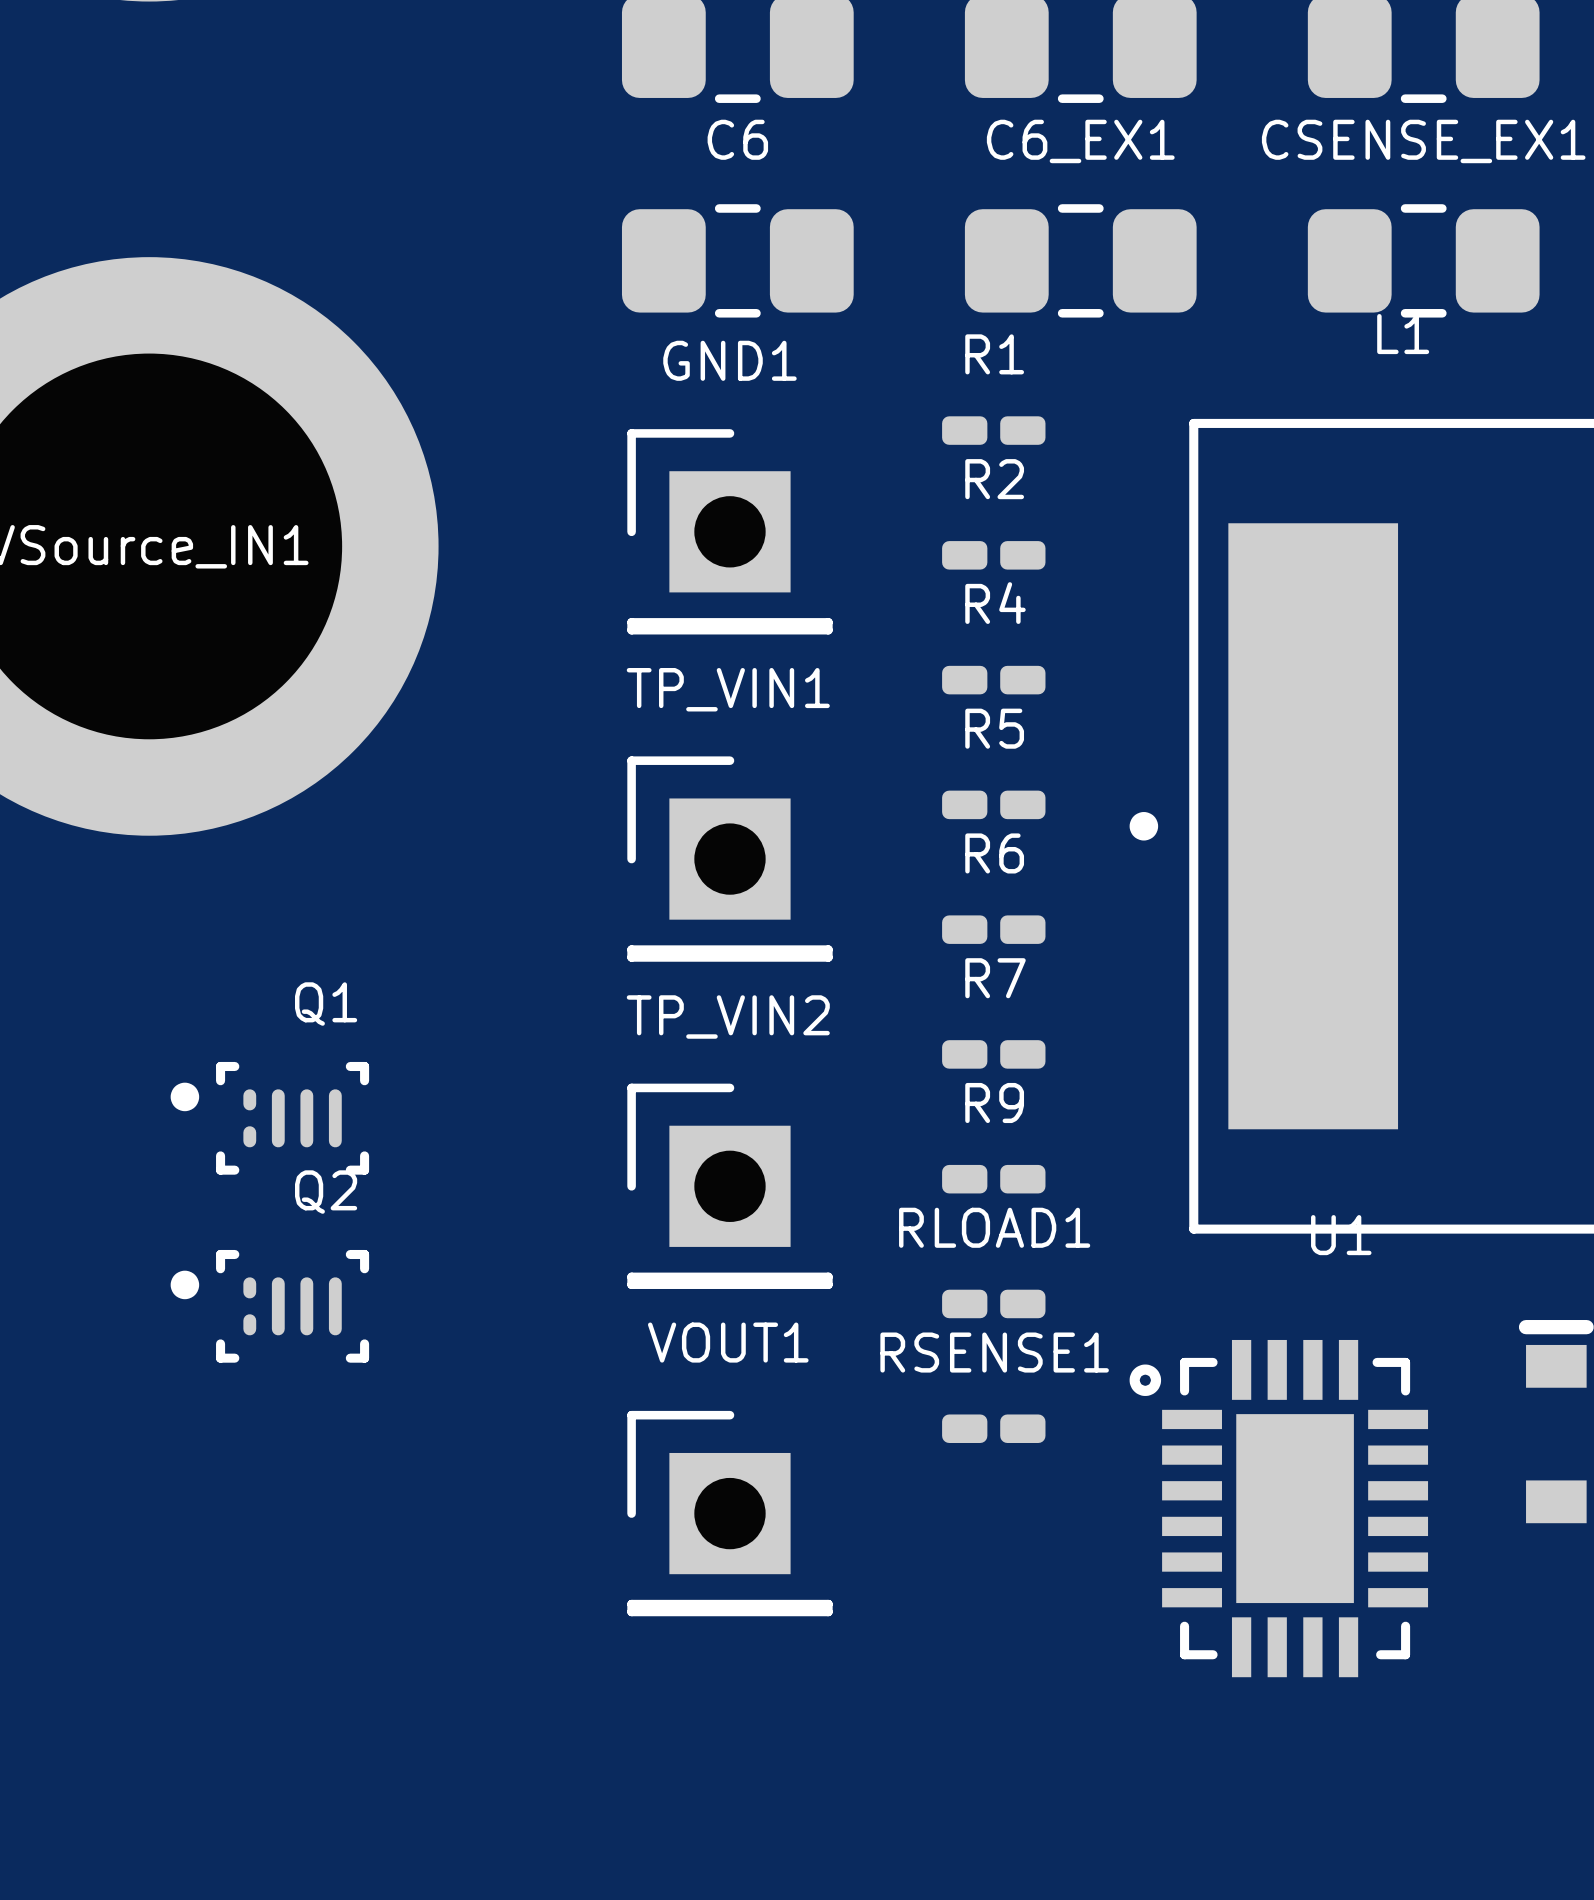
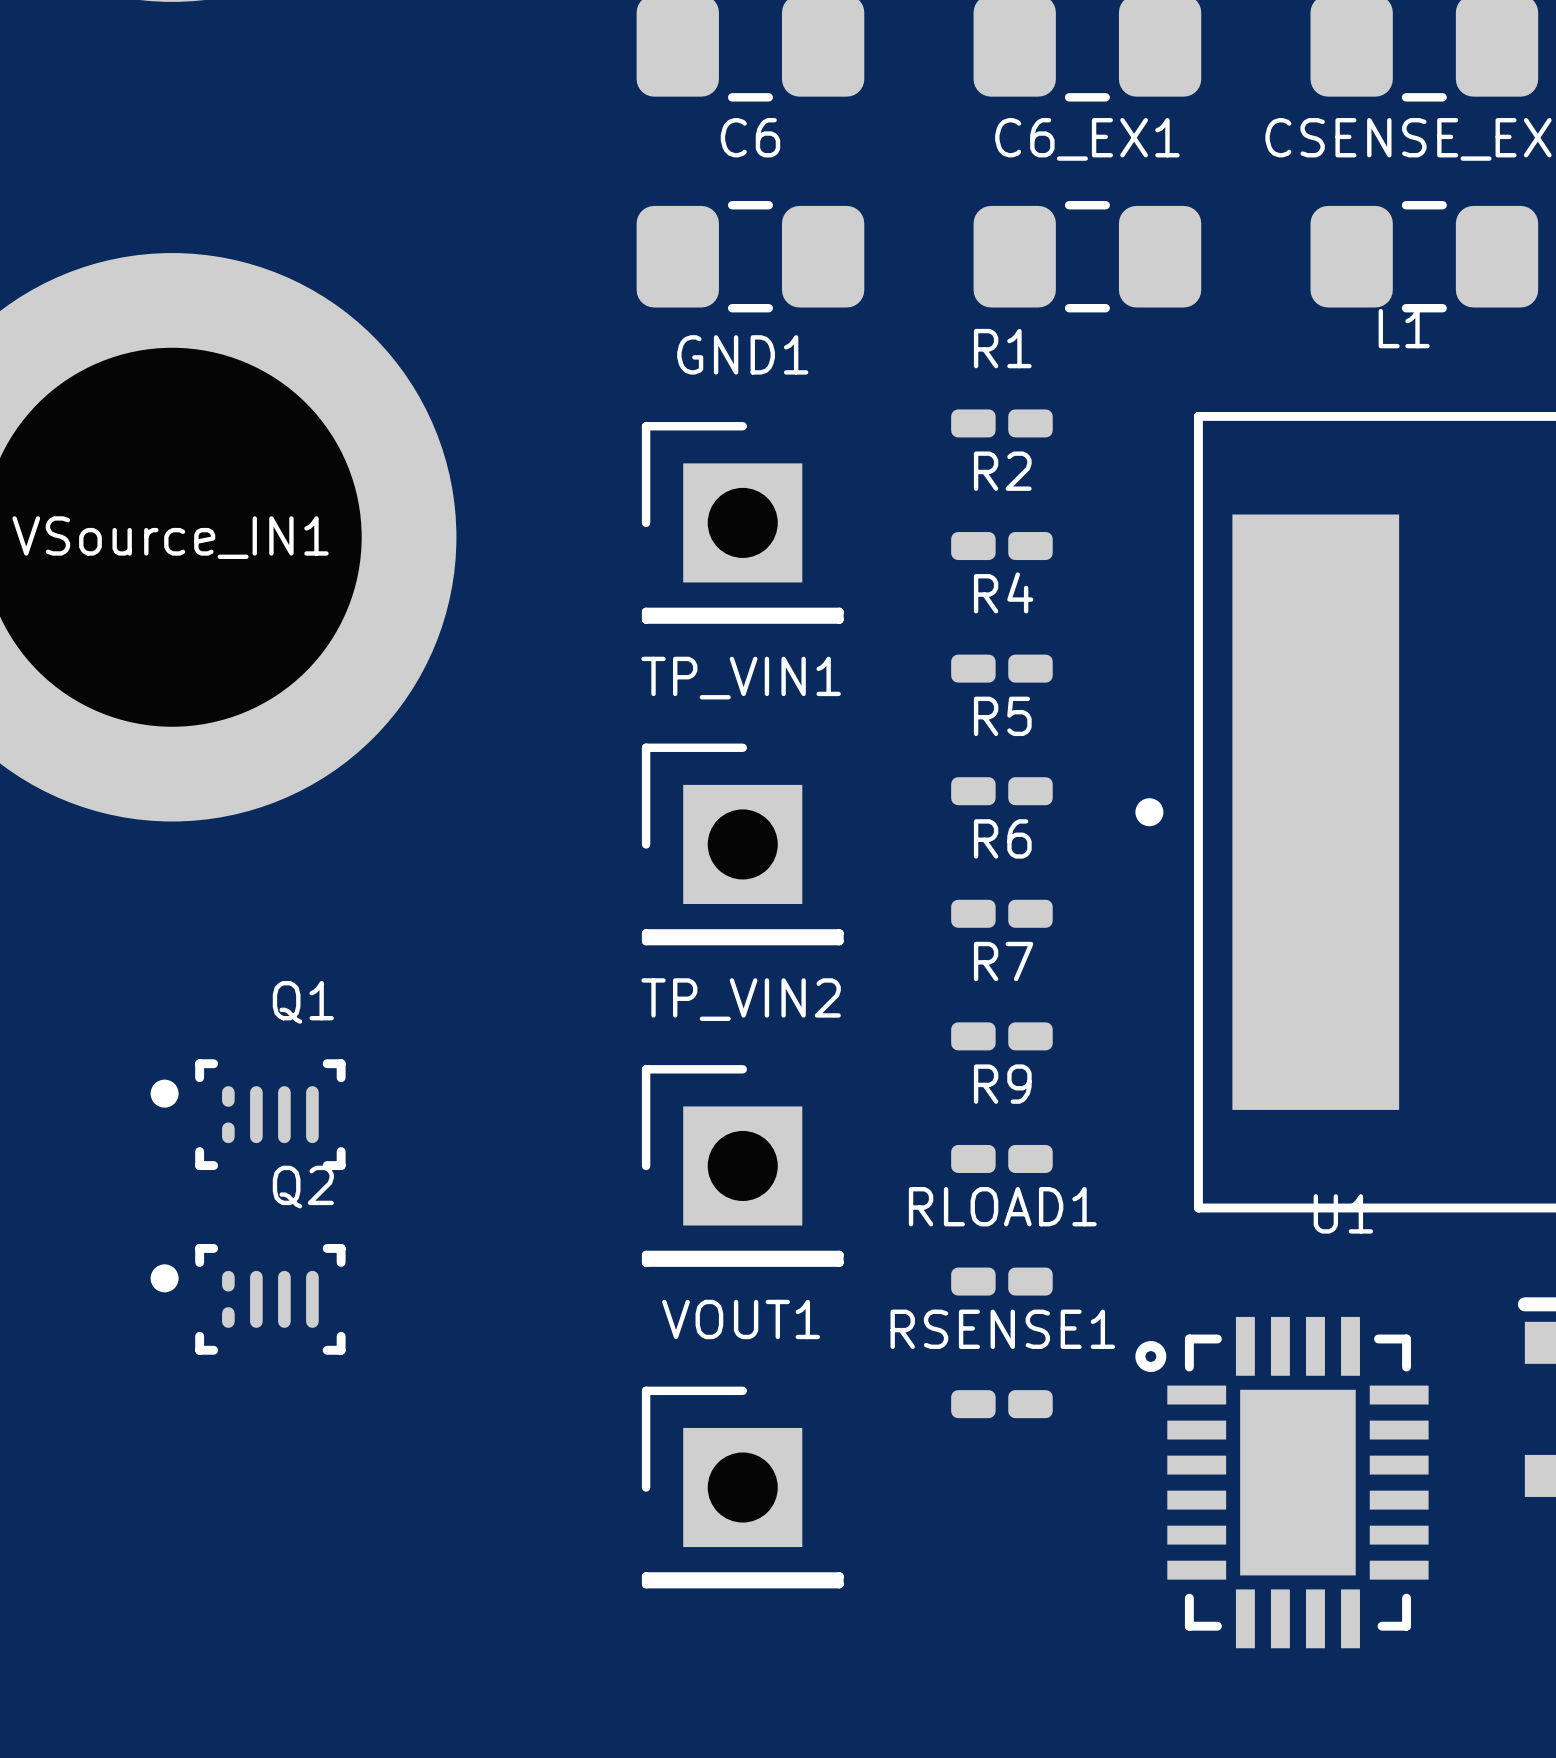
Q1 position: (269, 1118) -> (248, 1114)
Q2 position: (269, 1306) -> (248, 1299)

